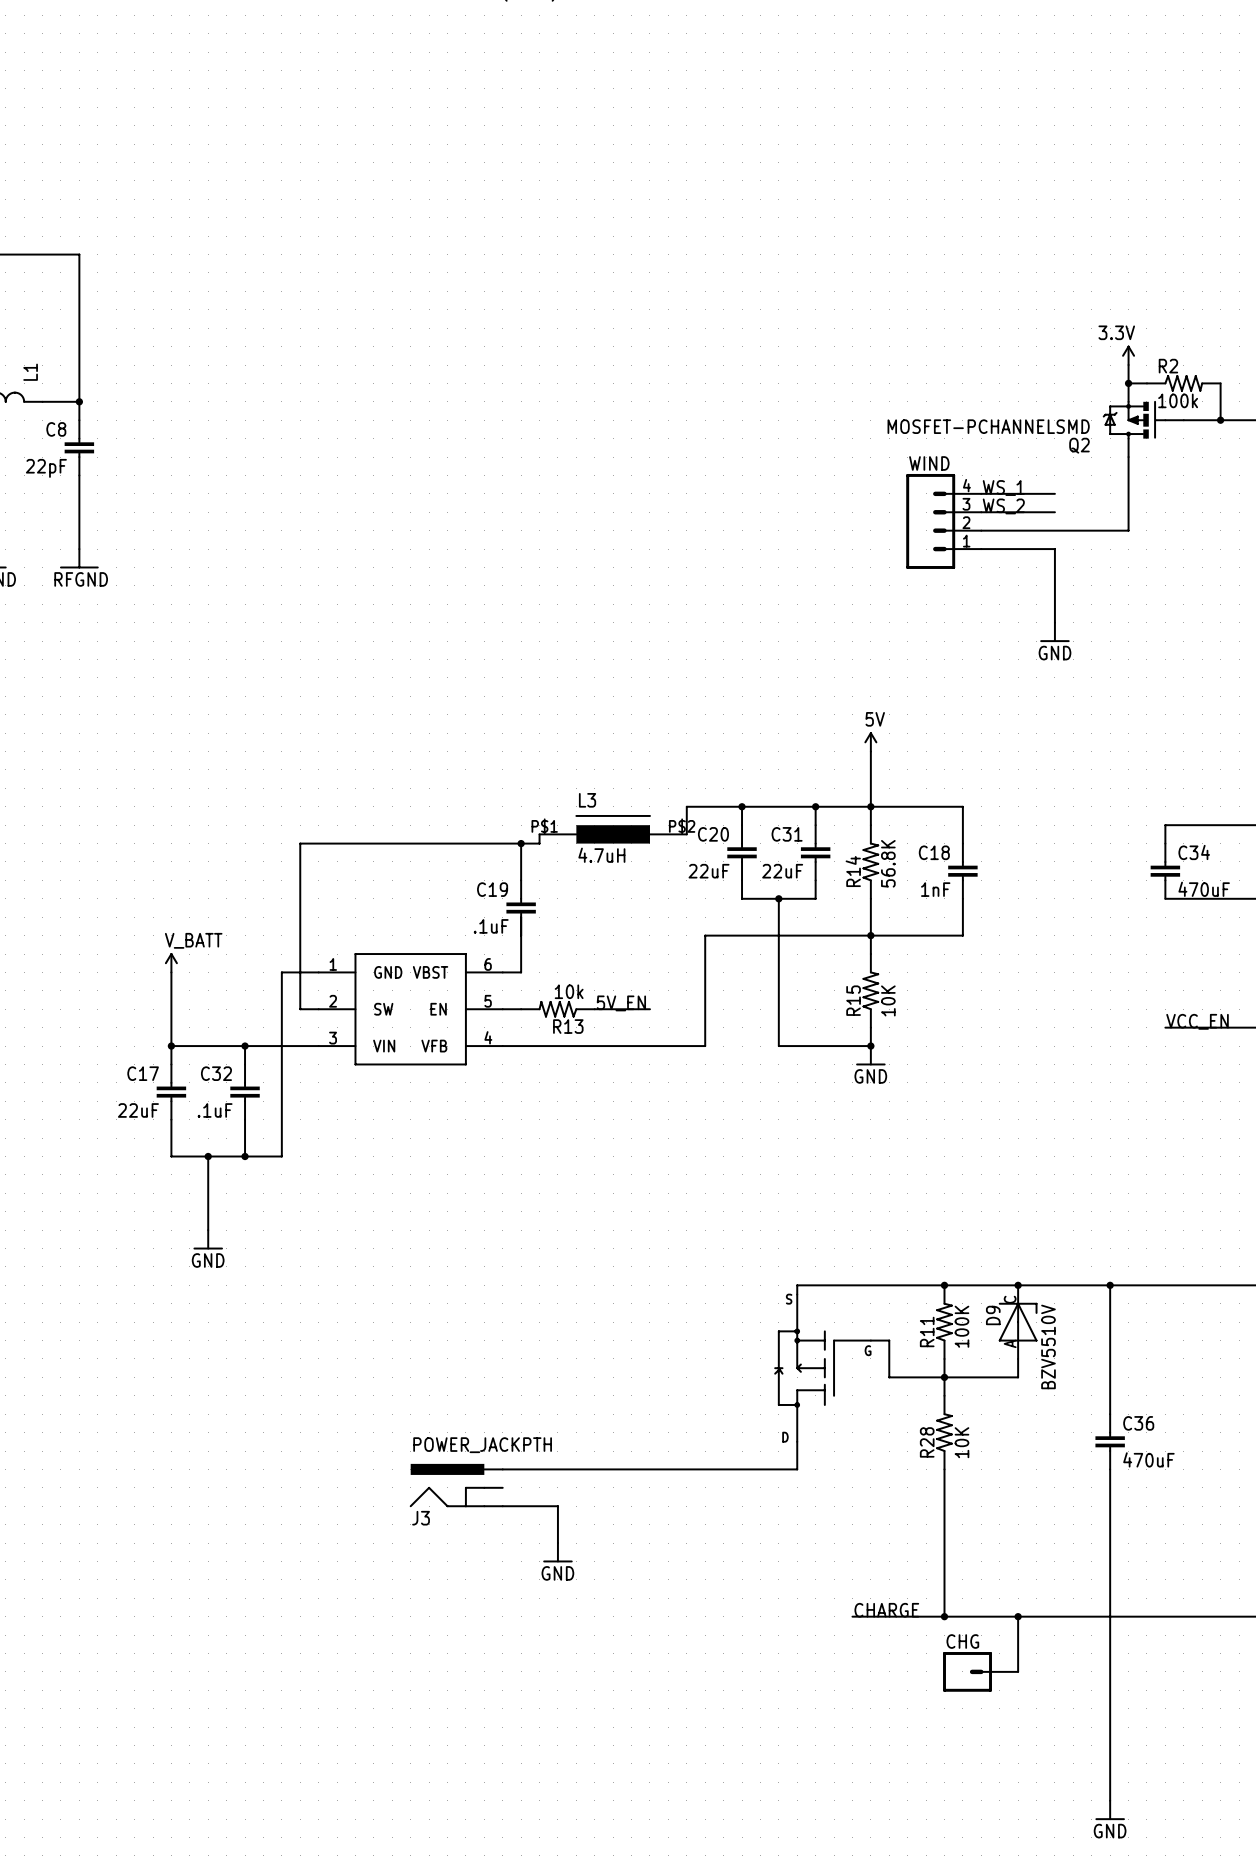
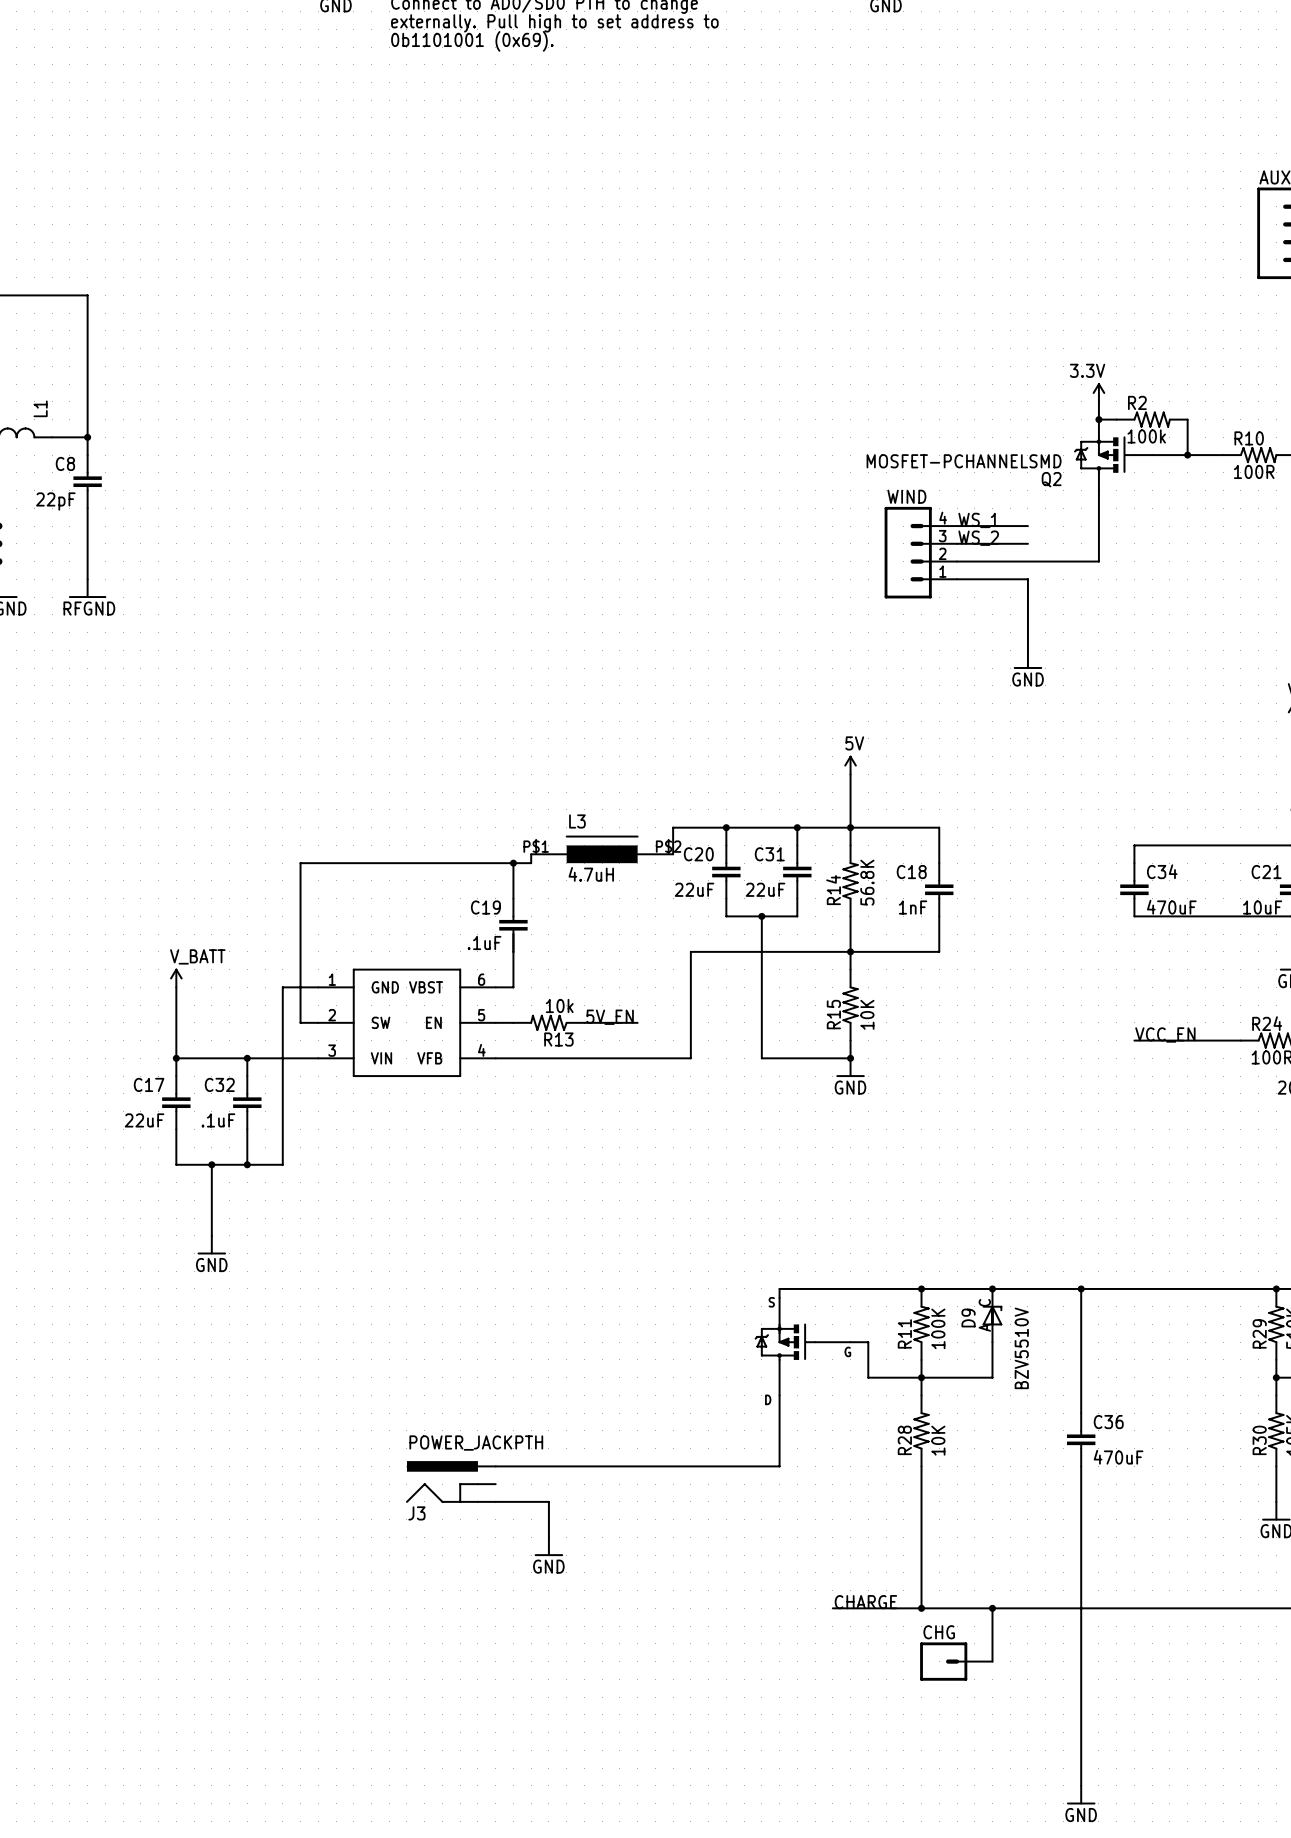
D9 symbol: [998, 1285, 1038, 1359] -> [982, 1288, 1003, 1343]
part: none -> (802, 1346)
part: (822, 1368) -> none

